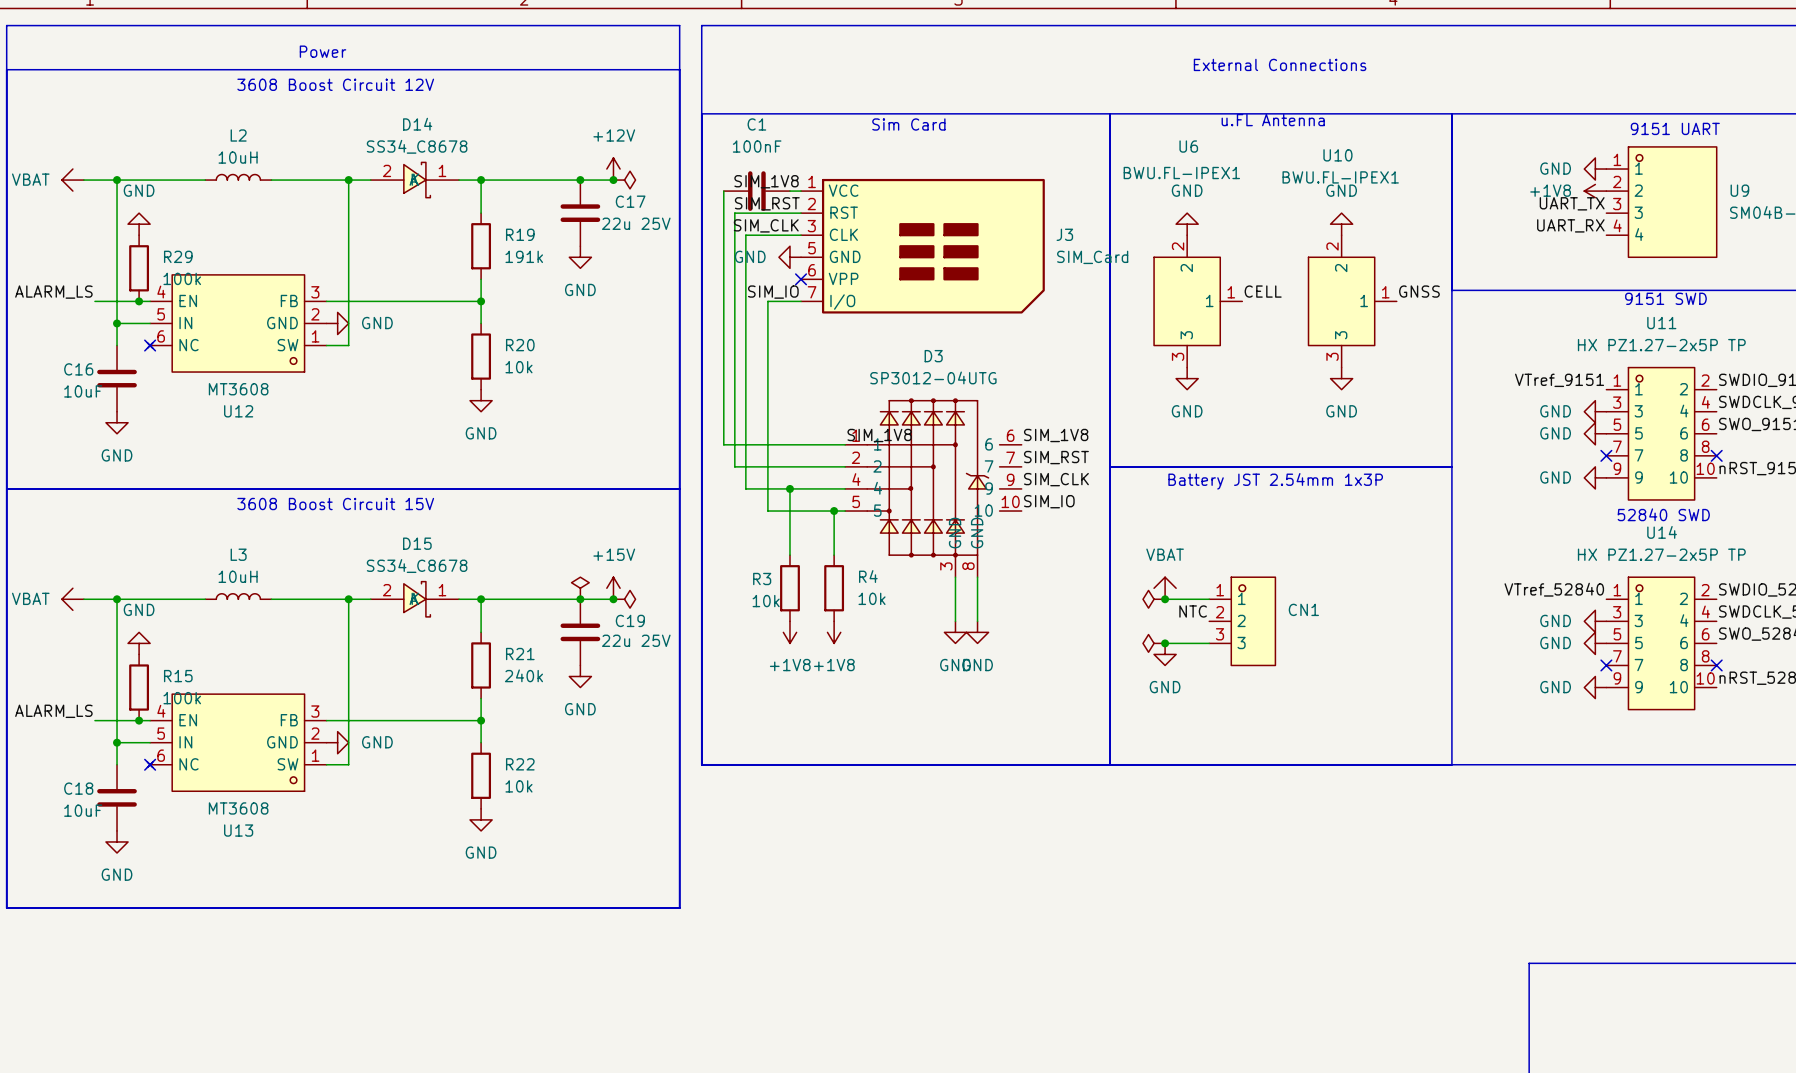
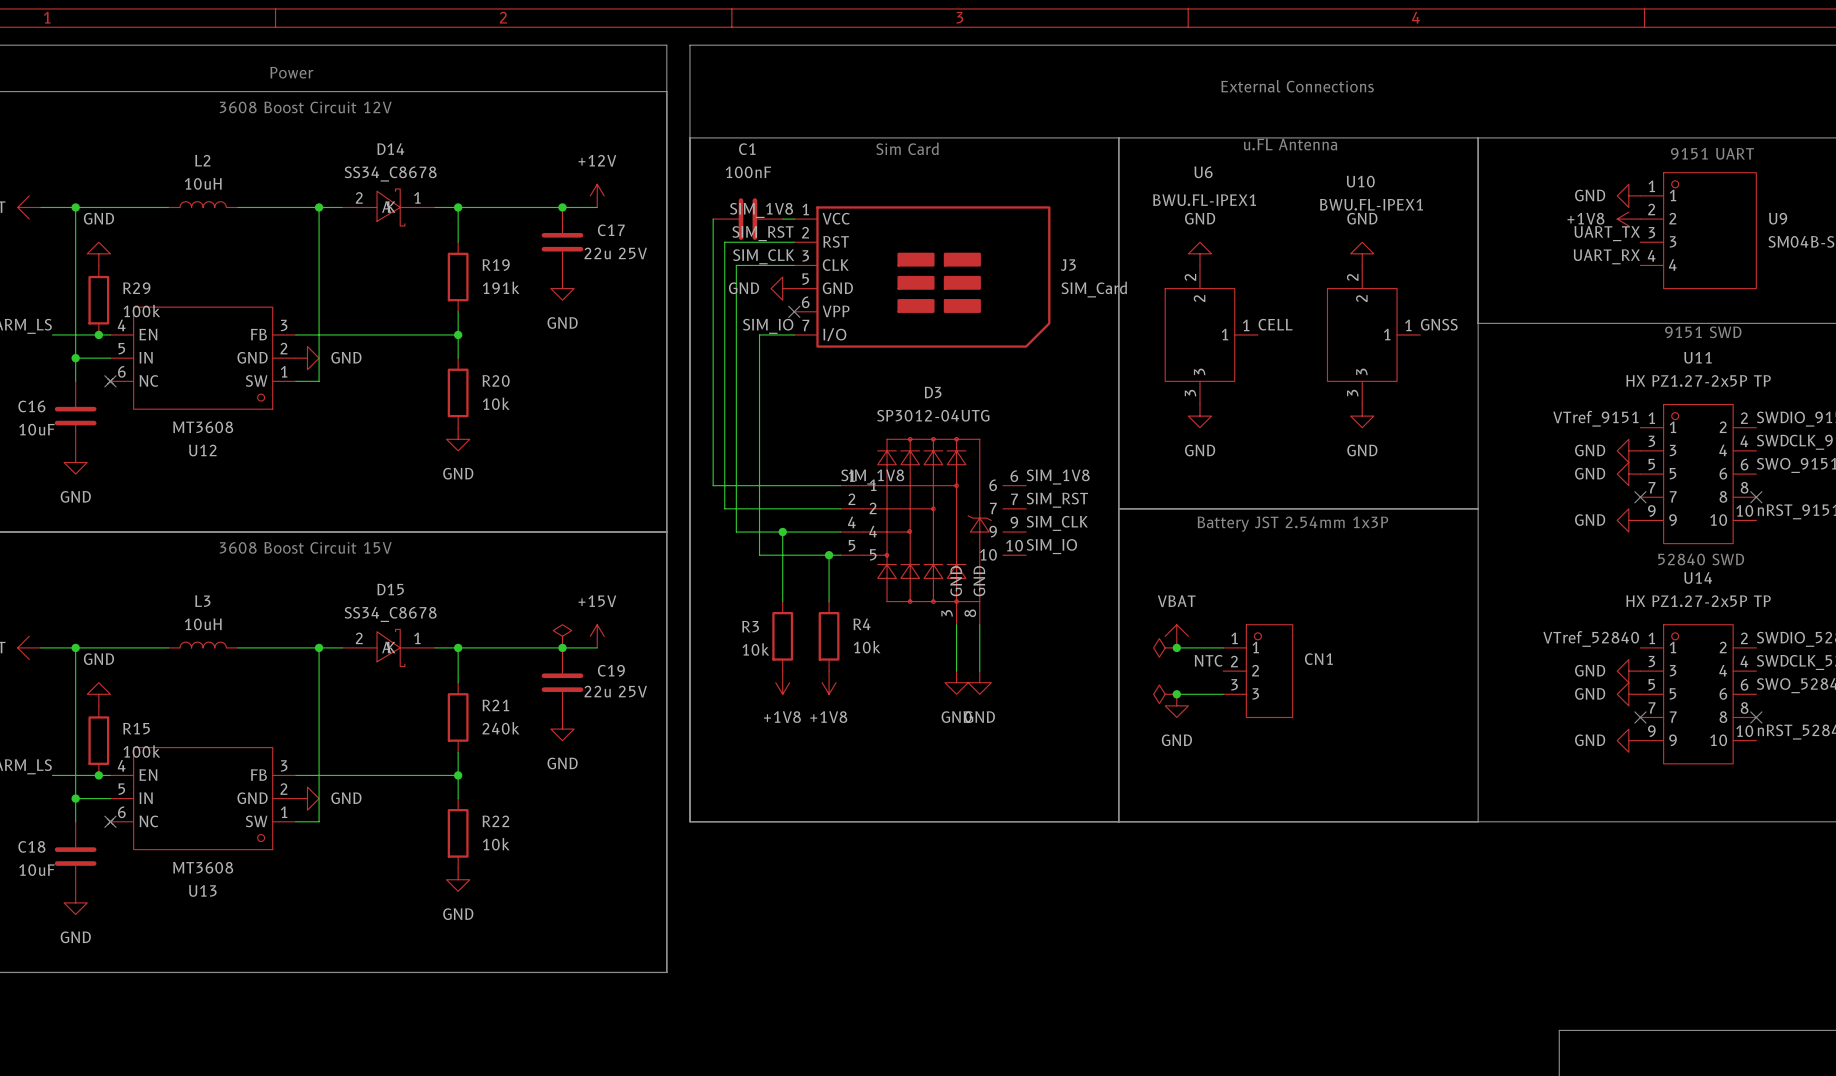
junction: (613, 180) -> none
power symbol: (624, 180) -> none
junction: (613, 599) -> none
power symbol: (624, 599) -> none

